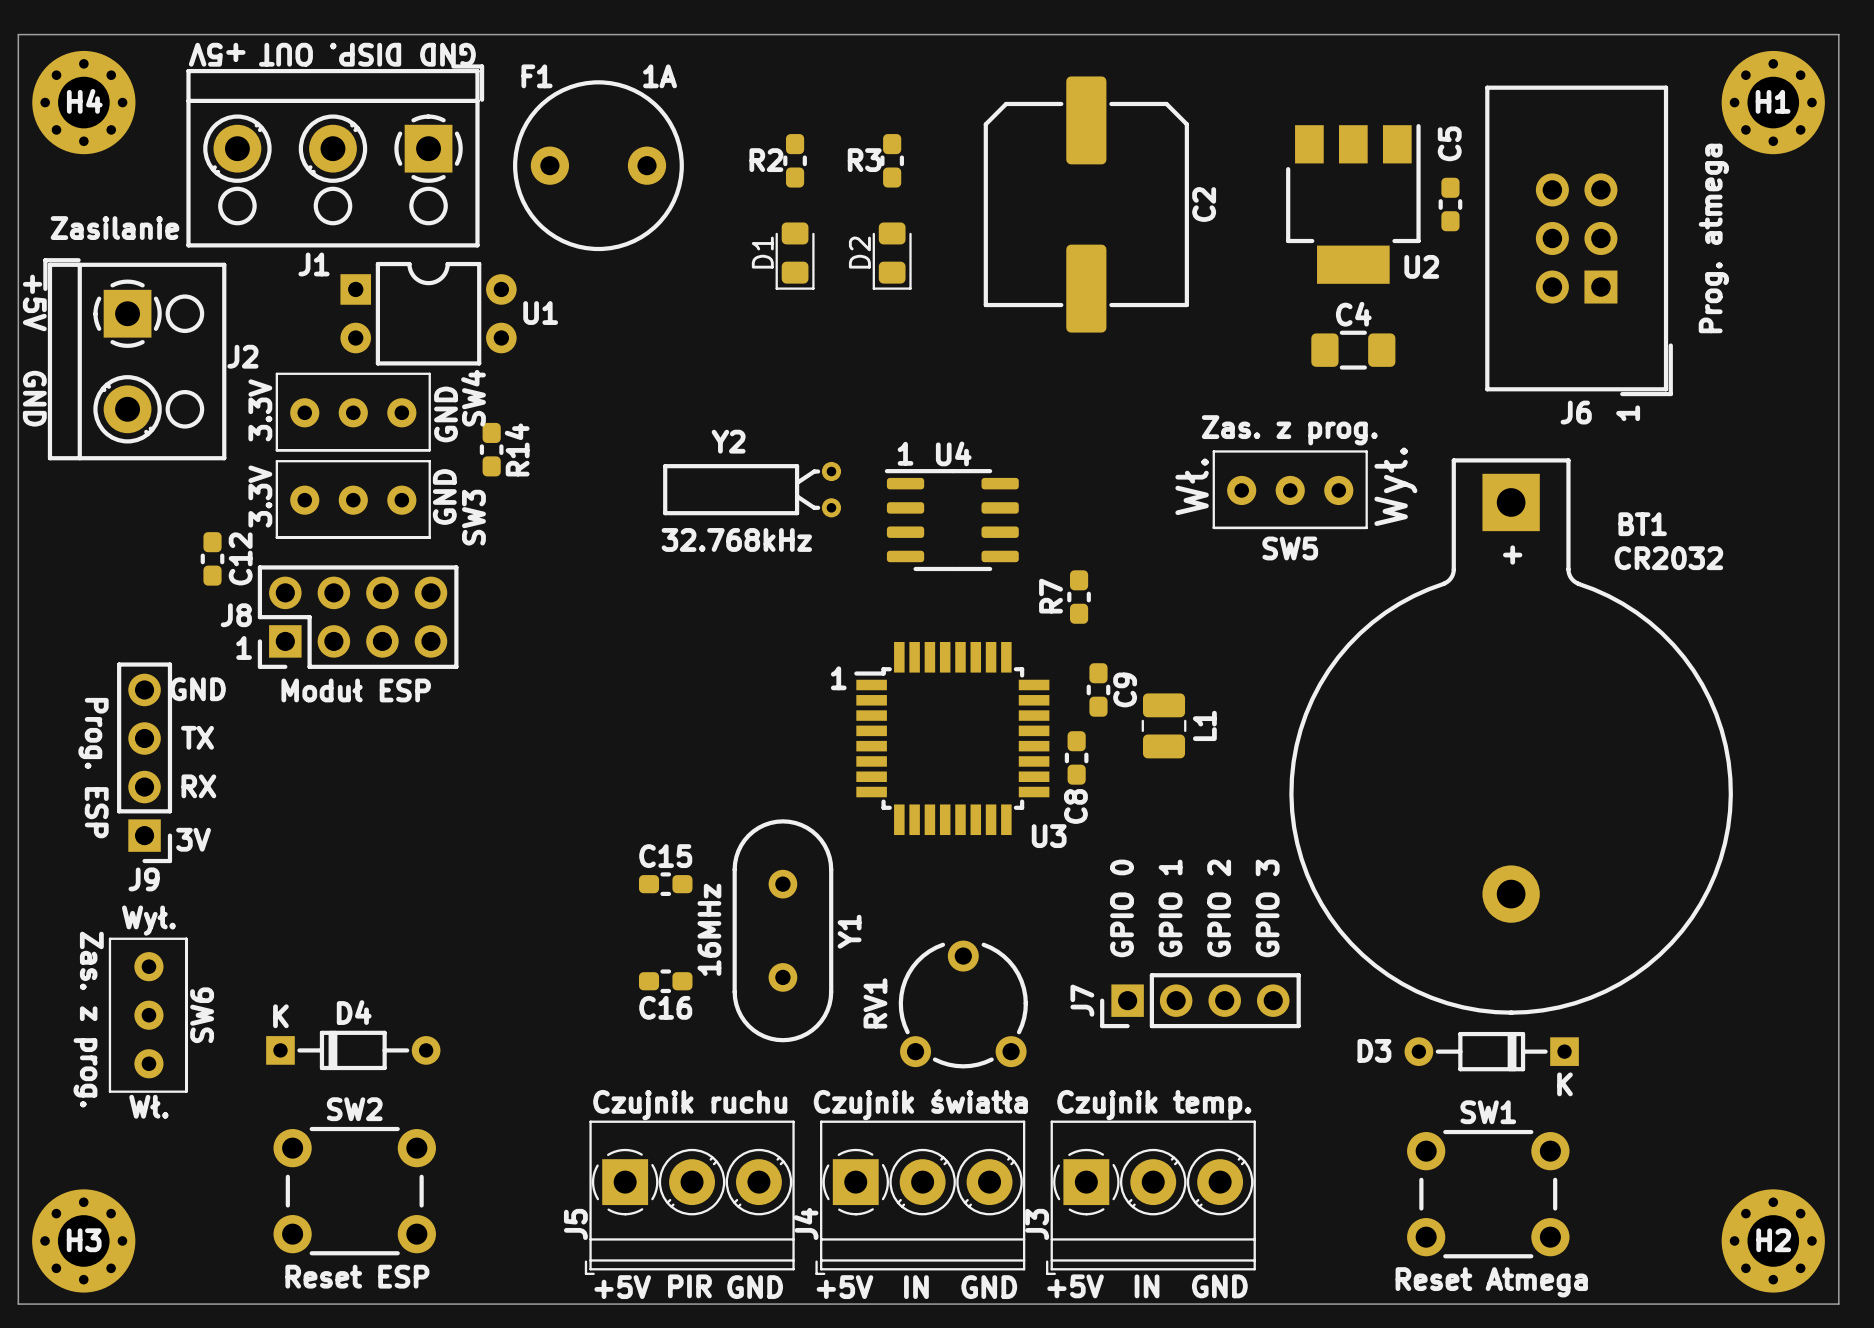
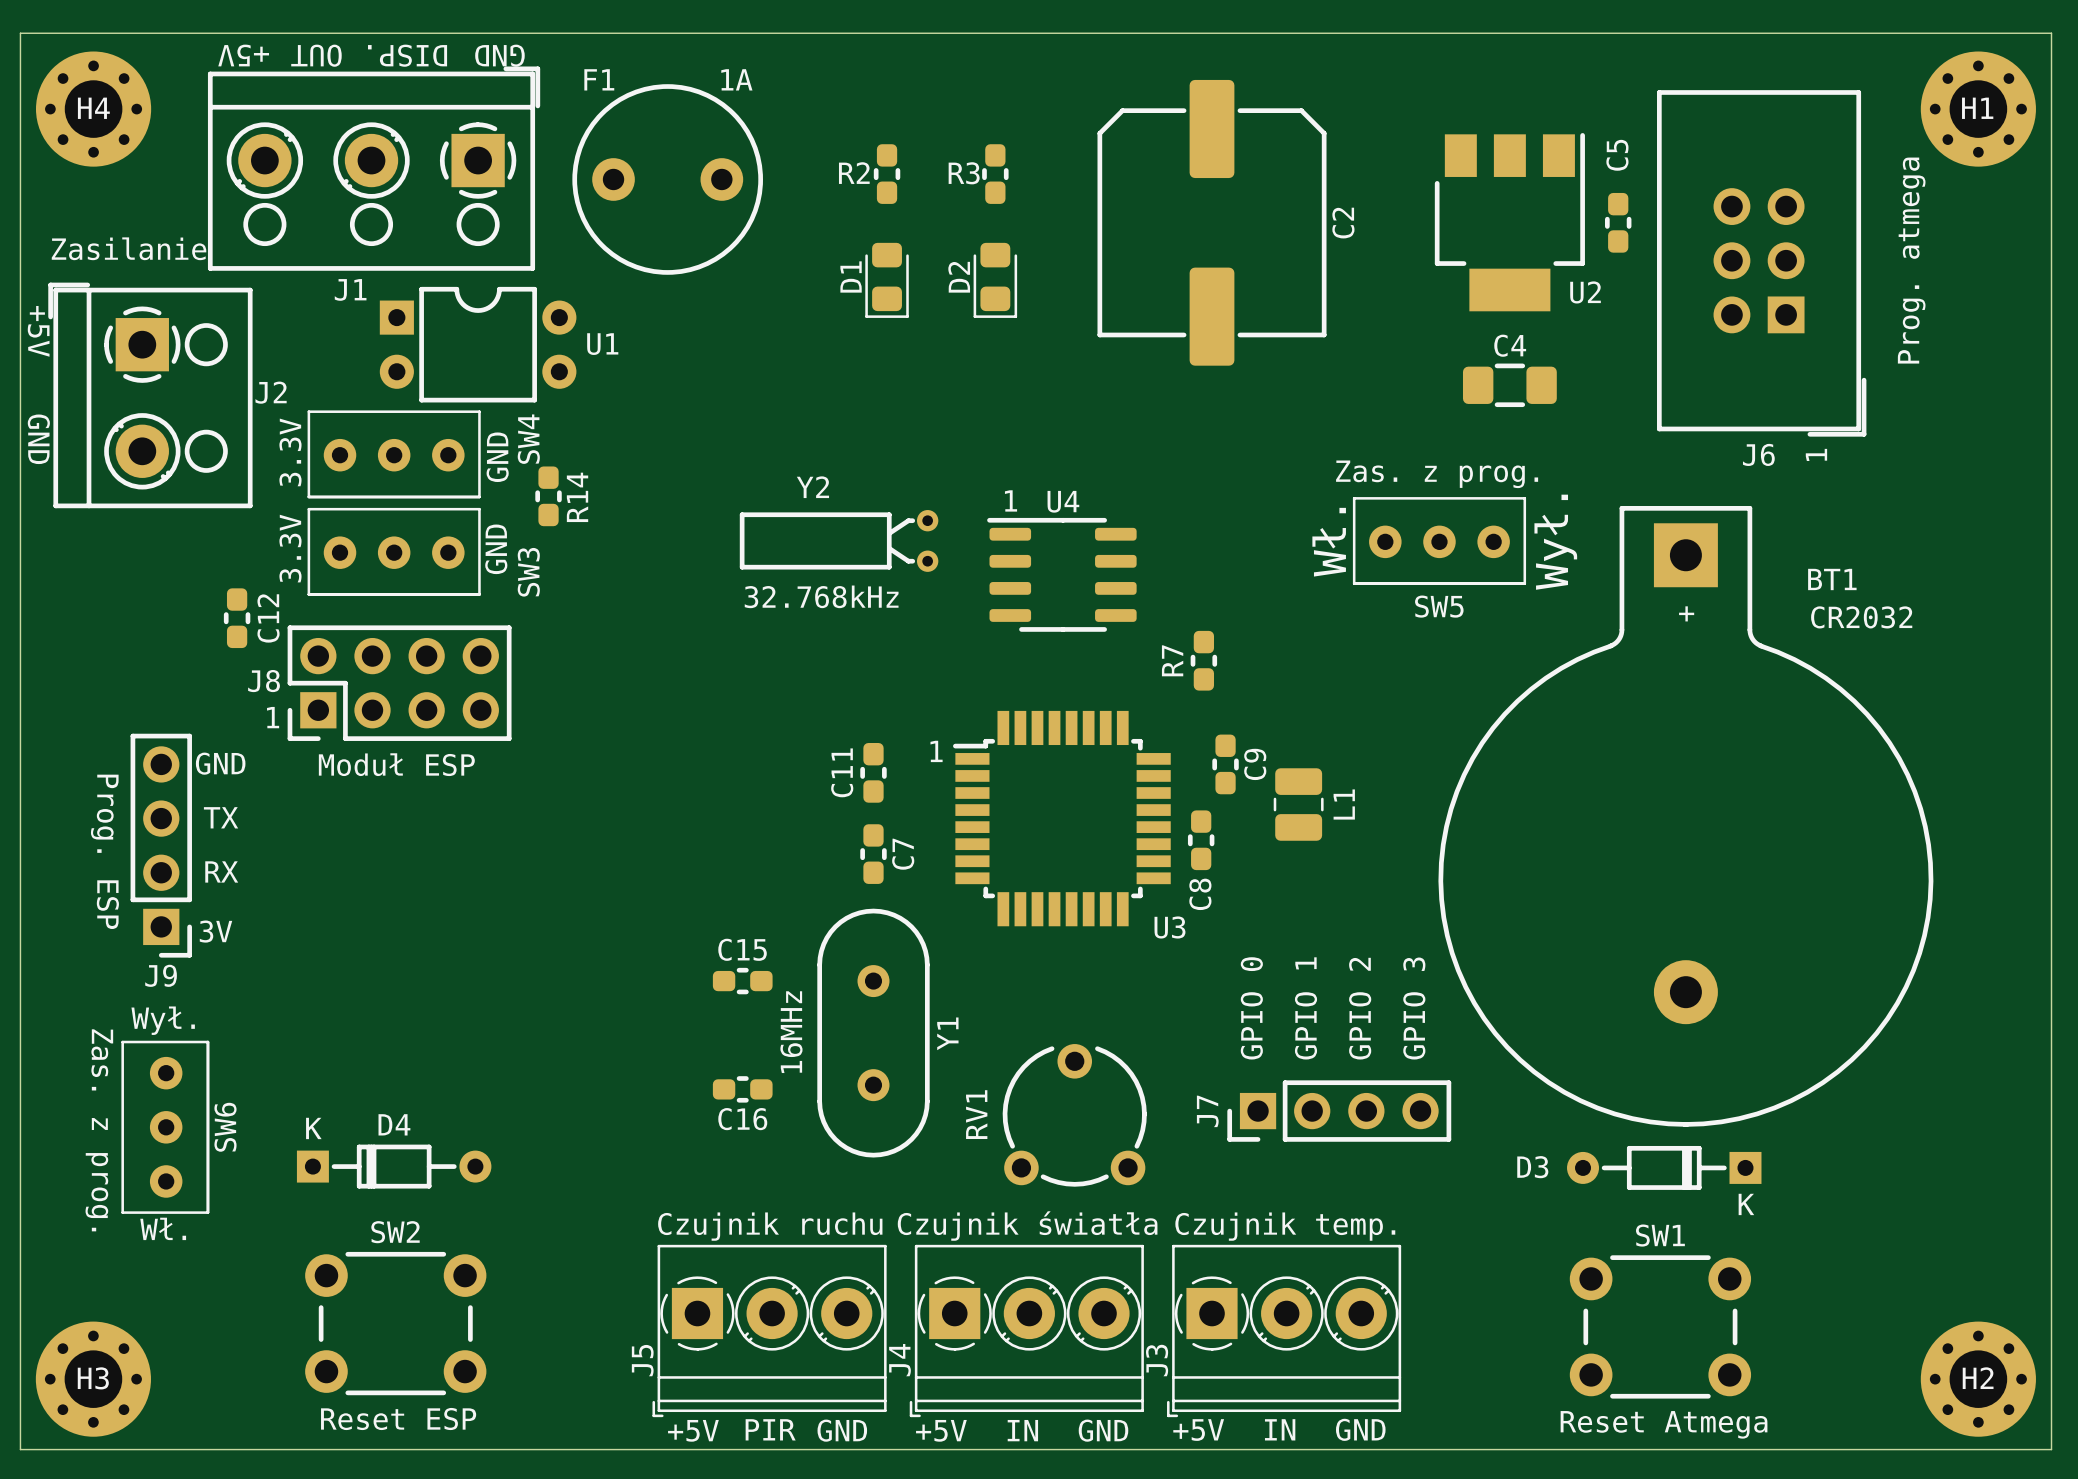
C11: none -> (873, 772)
C7: none -> (873, 854)

